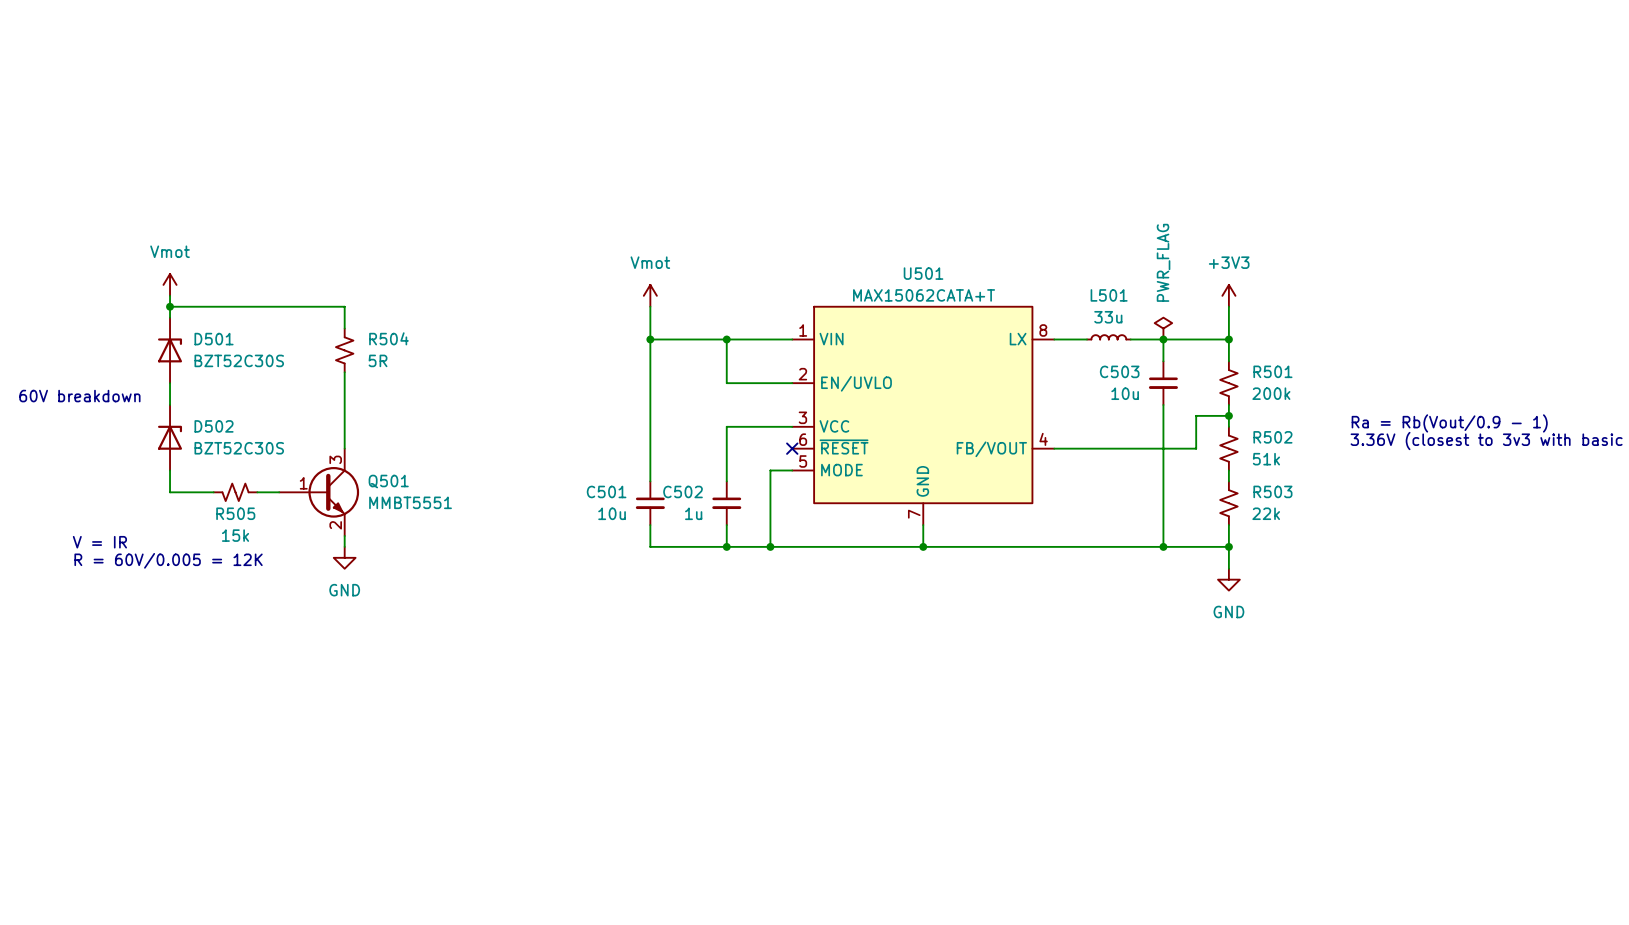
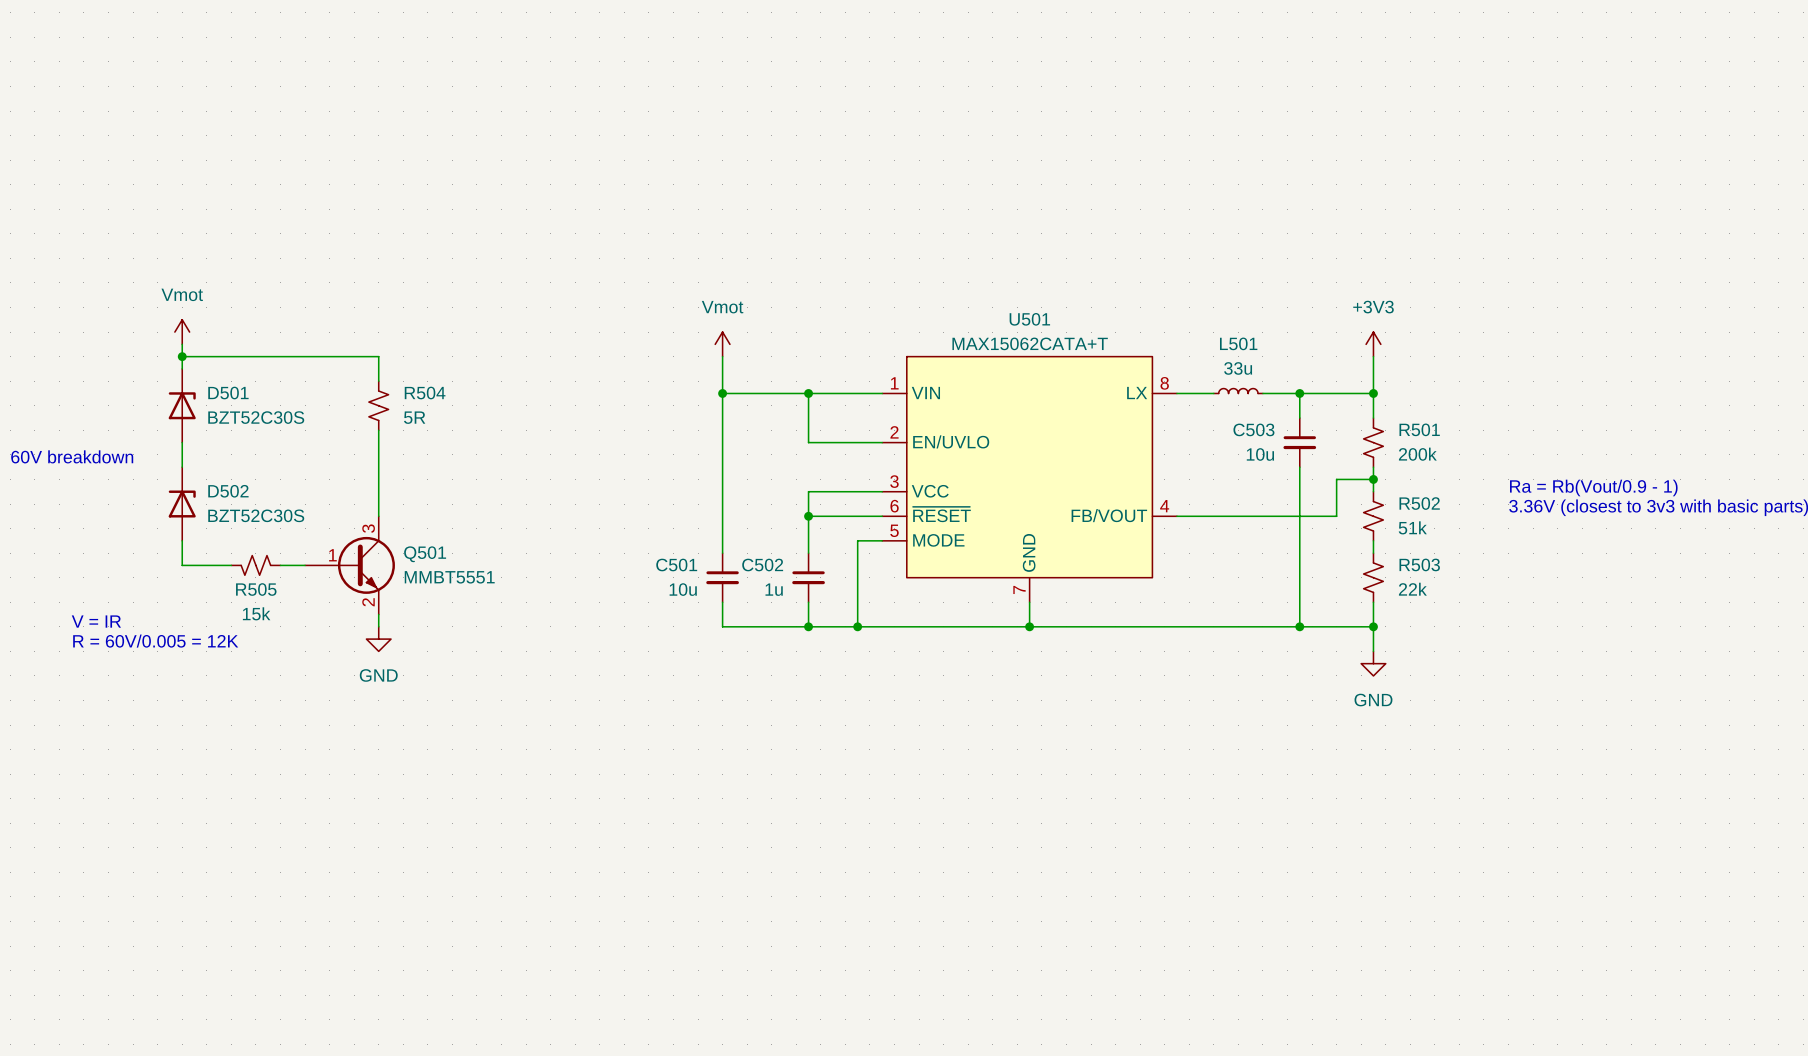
power symbol: PWR_FLAG (1163, 328) -> none
wire: none -> (808, 516) (882, 516)
junction: none -> (808, 516)
no-connect mark: (792, 448) -> none

